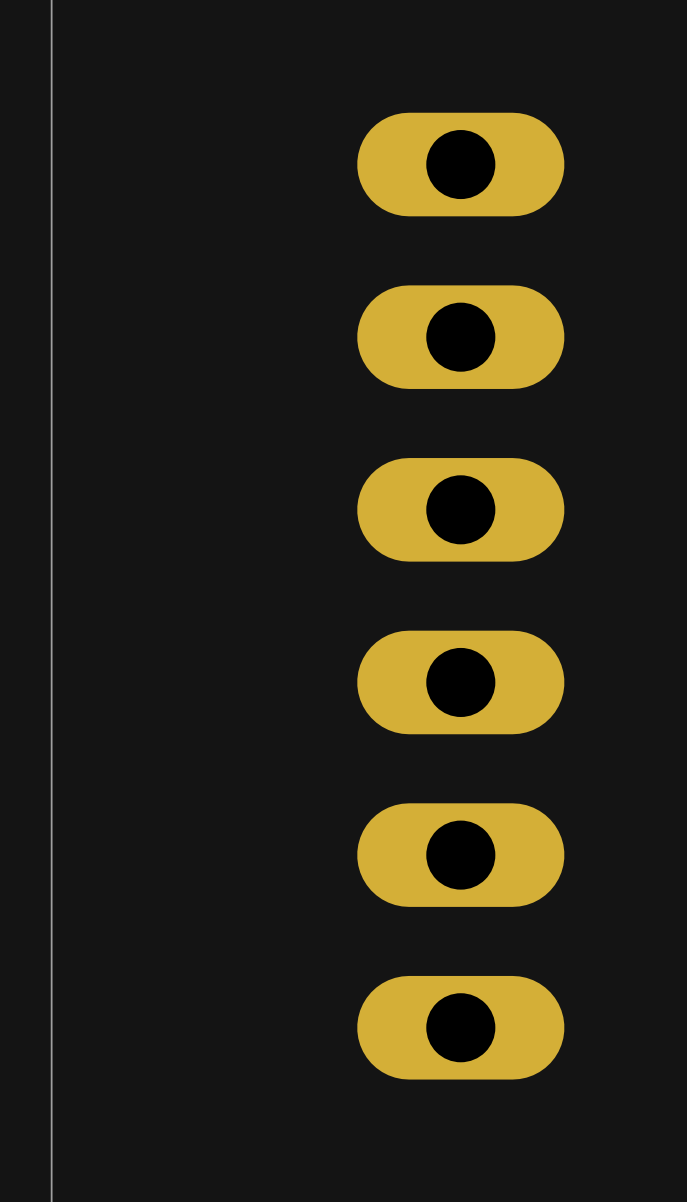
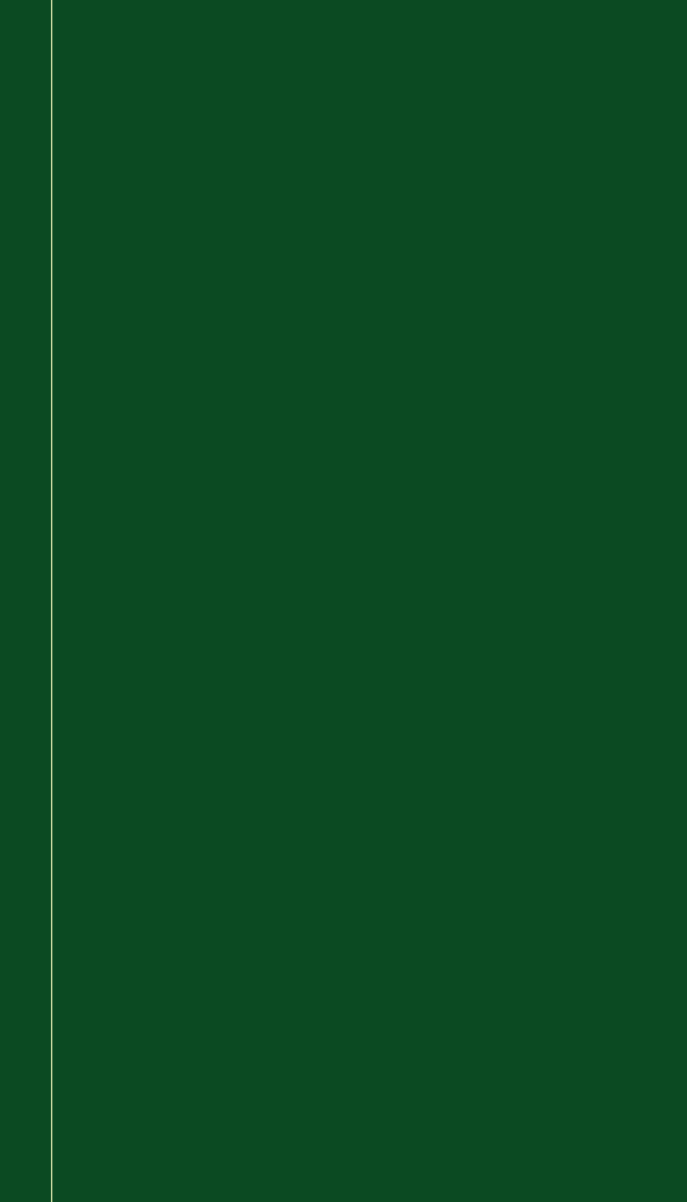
part: (460, 596) -> none

